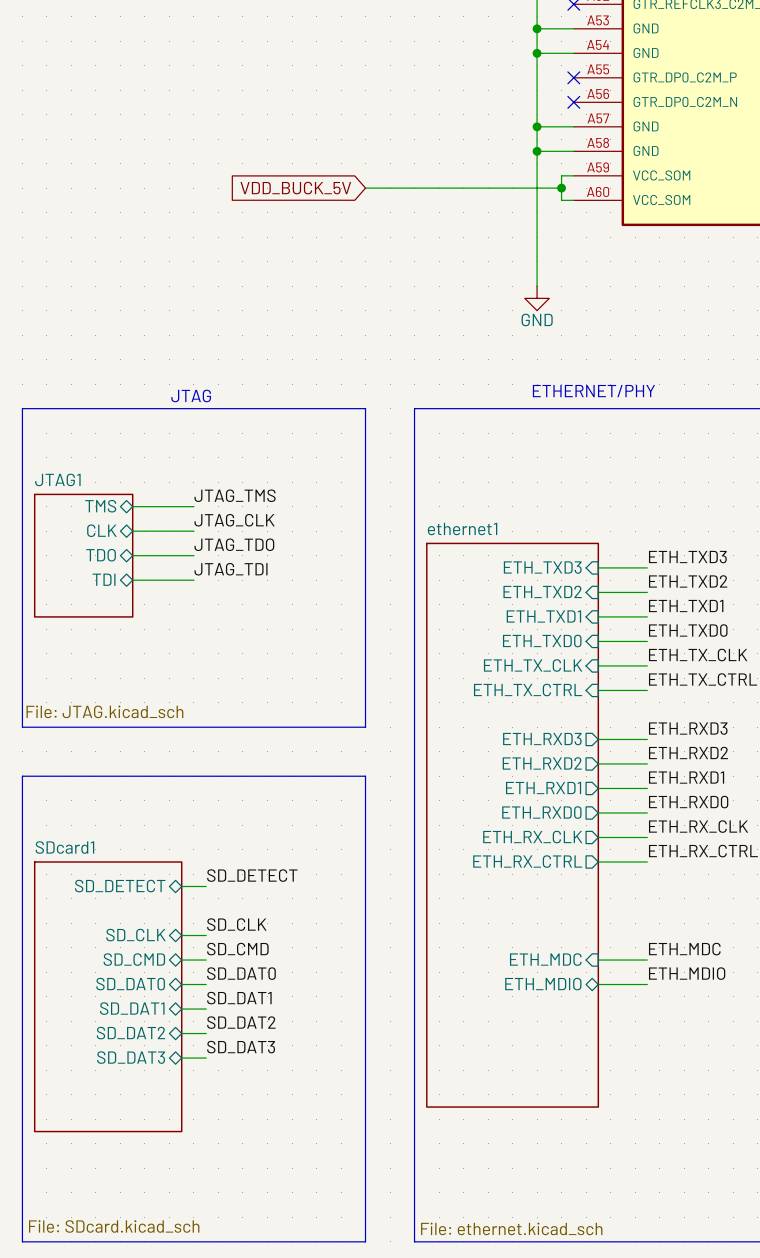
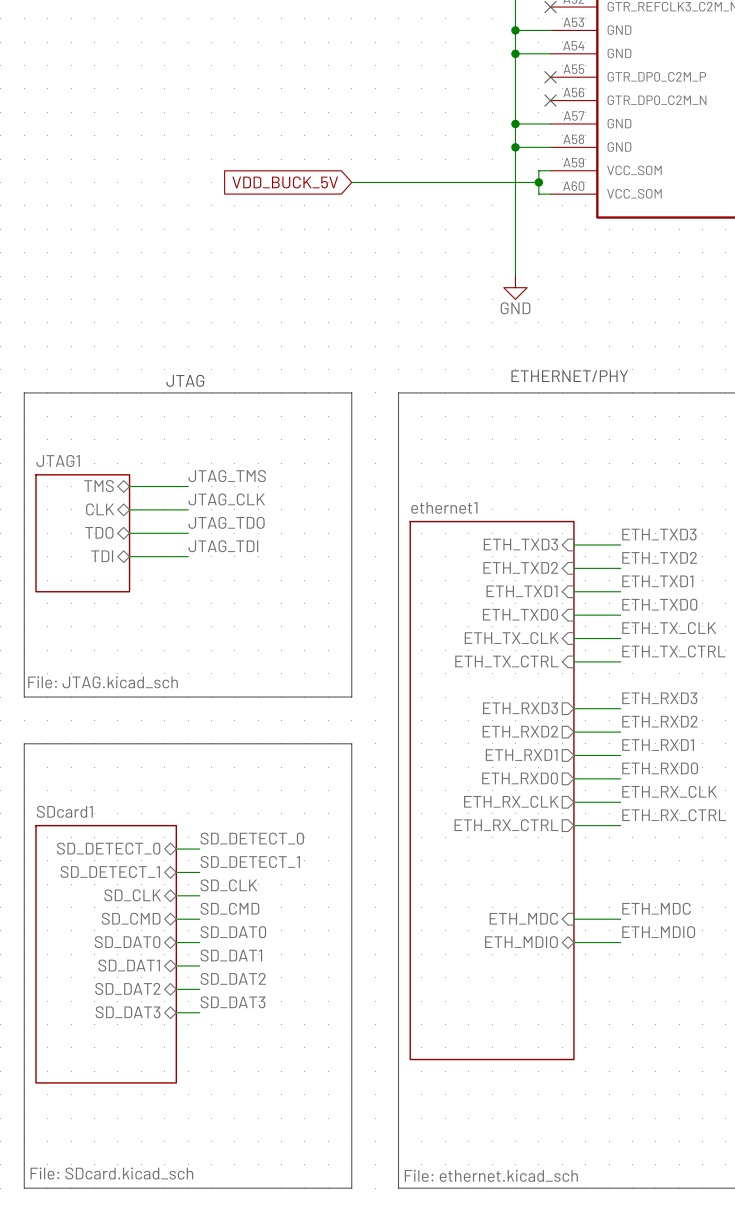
label: SD_DETECT (252, 875) -> SD_DETECT_0 (252, 838)
sheet pin: SD_DETECT (120, 886) -> SD_DETECT_0 (108, 848)
label: none -> SD_DETECT_1 (250, 861)
sheet pin: none -> SD_DETECT_1 (110, 871)
wire: none -> (176, 872) (199, 872)

